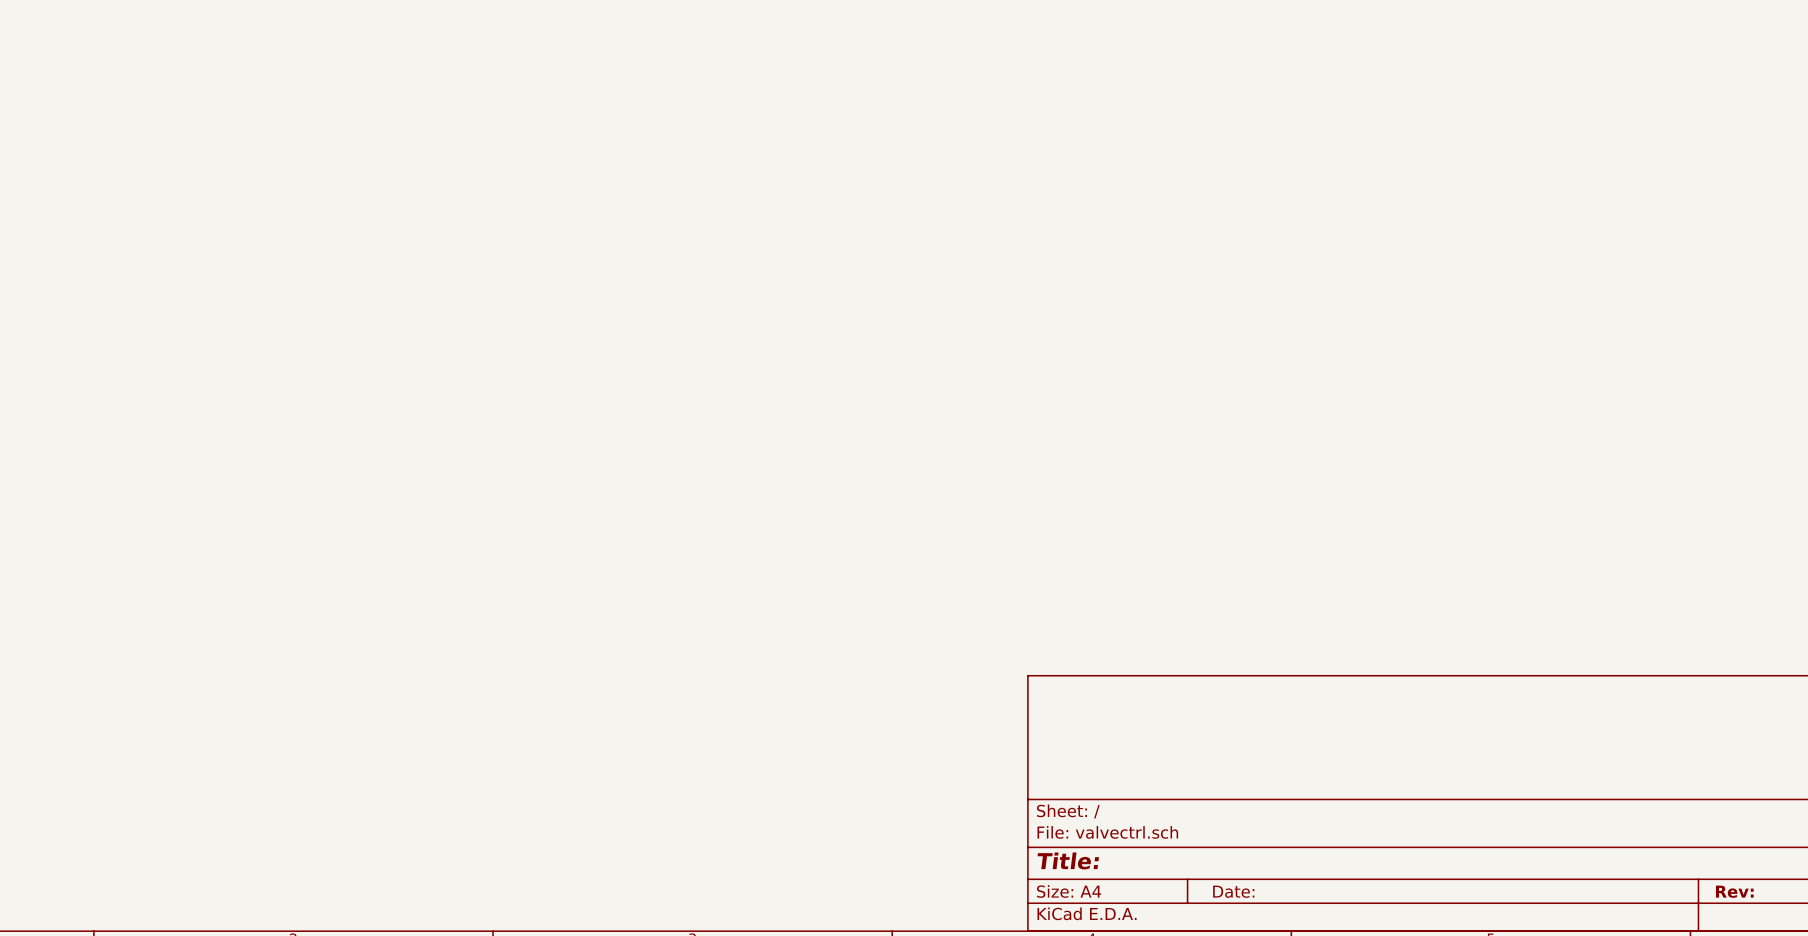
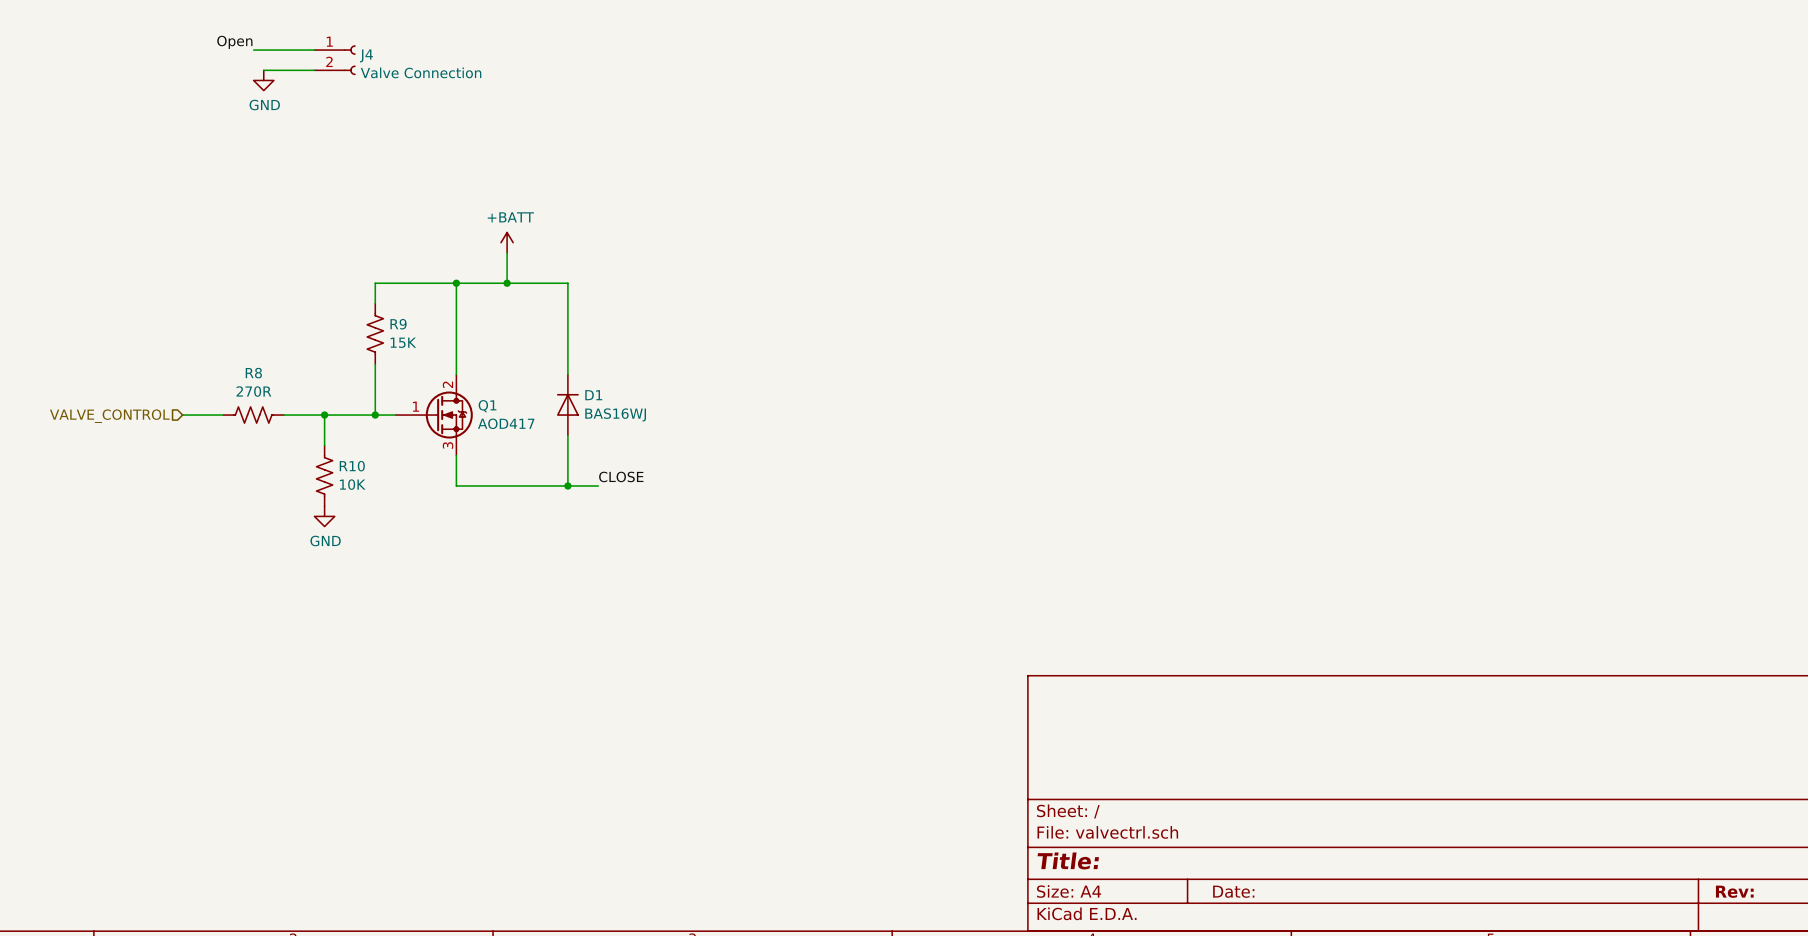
label: none -> Open (234, 42)
wire: none -> (253, 50) (314, 50)
J4: none -> Valve Connection (335, 60)
wire: none -> (263, 70) (314, 70)
power symbol: none -> GND (263, 80)
power symbol: none -> +BATT (507, 242)
wire: none -> (507, 252) (507, 283)
wire: none -> (456, 283) (456, 374)
junction: none -> (456, 283)
junction: none -> (507, 283)
wire: none -> (375, 303) (375, 283) (567, 283) (567, 374)
R9: none -> 15K (375, 333)
wire: none -> (375, 364) (375, 415)
D1: none -> BAS16WJ (567, 404)
wire: none -> (182, 415) (223, 415)
R8: none -> 270R (253, 415)
wire: none -> (284, 415) (395, 415)
wire: none -> (324, 415) (324, 445)
junction: none -> (324, 415)
junction: none -> (375, 415)
Q1: none -> AOD417 (434, 415)
hierarchical label: none -> VALVE_CONTROL (109, 416)
wire: none -> (567, 435) (567, 486)
wire: none -> (456, 455) (456, 486) (598, 486)
R10: none -> 10K (324, 475)
label: none -> CLOSE (621, 476)
junction: none -> (567, 486)
power symbol: none -> GND (324, 516)

